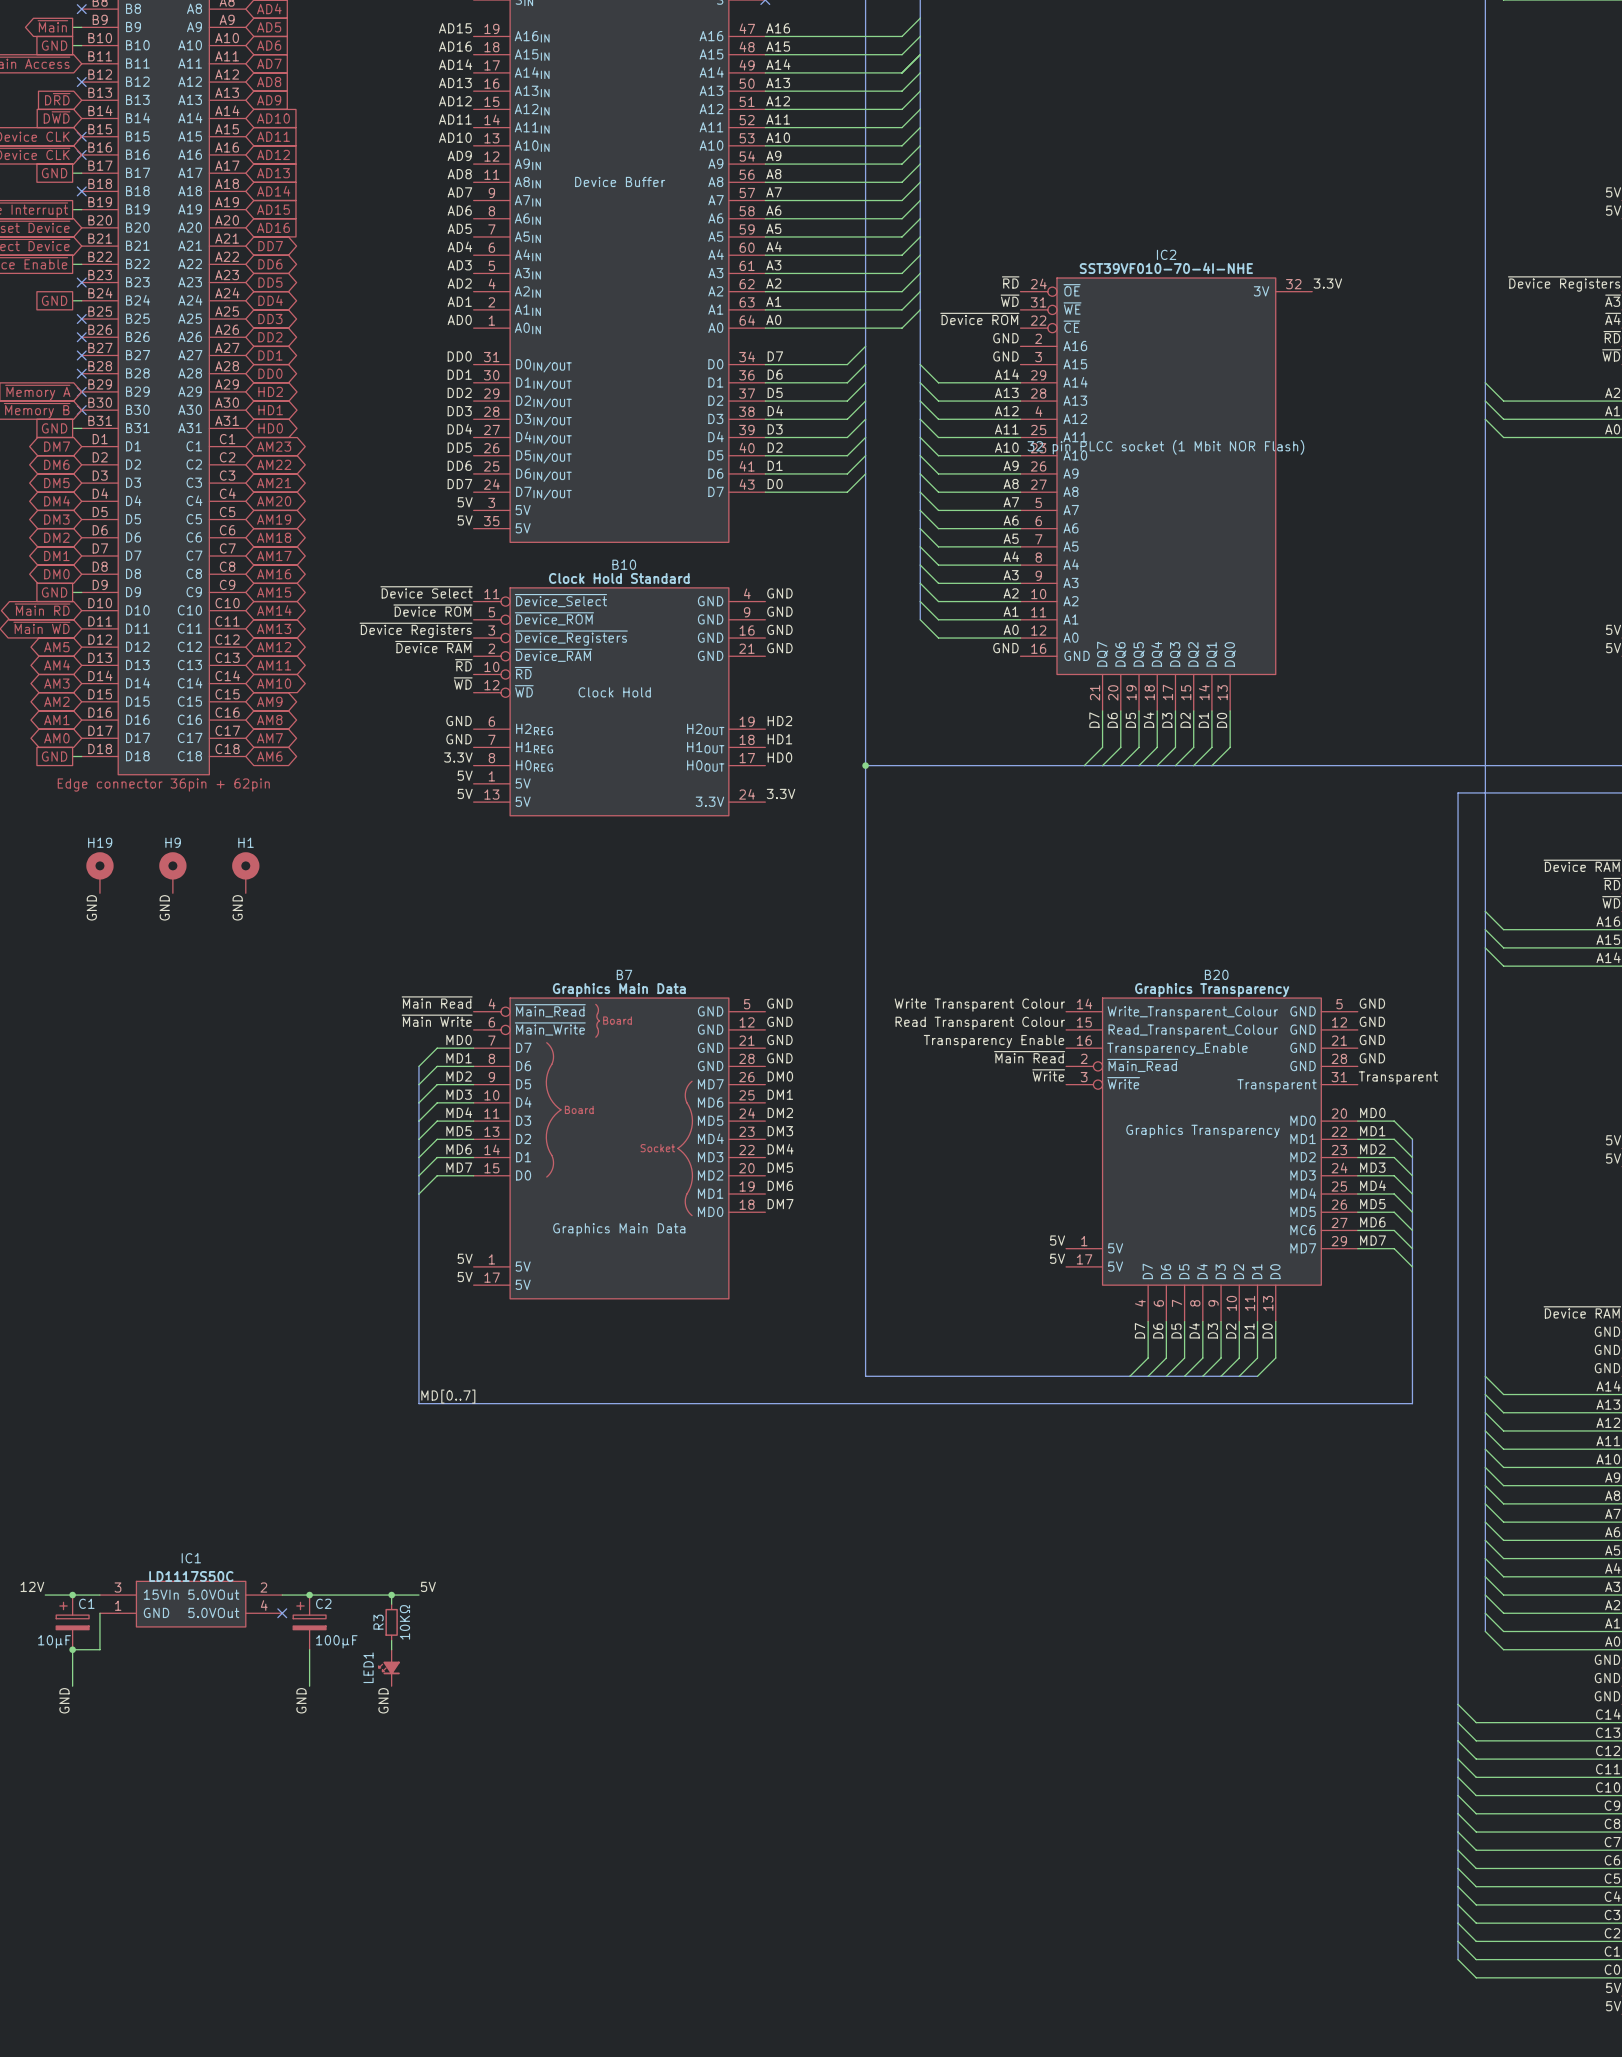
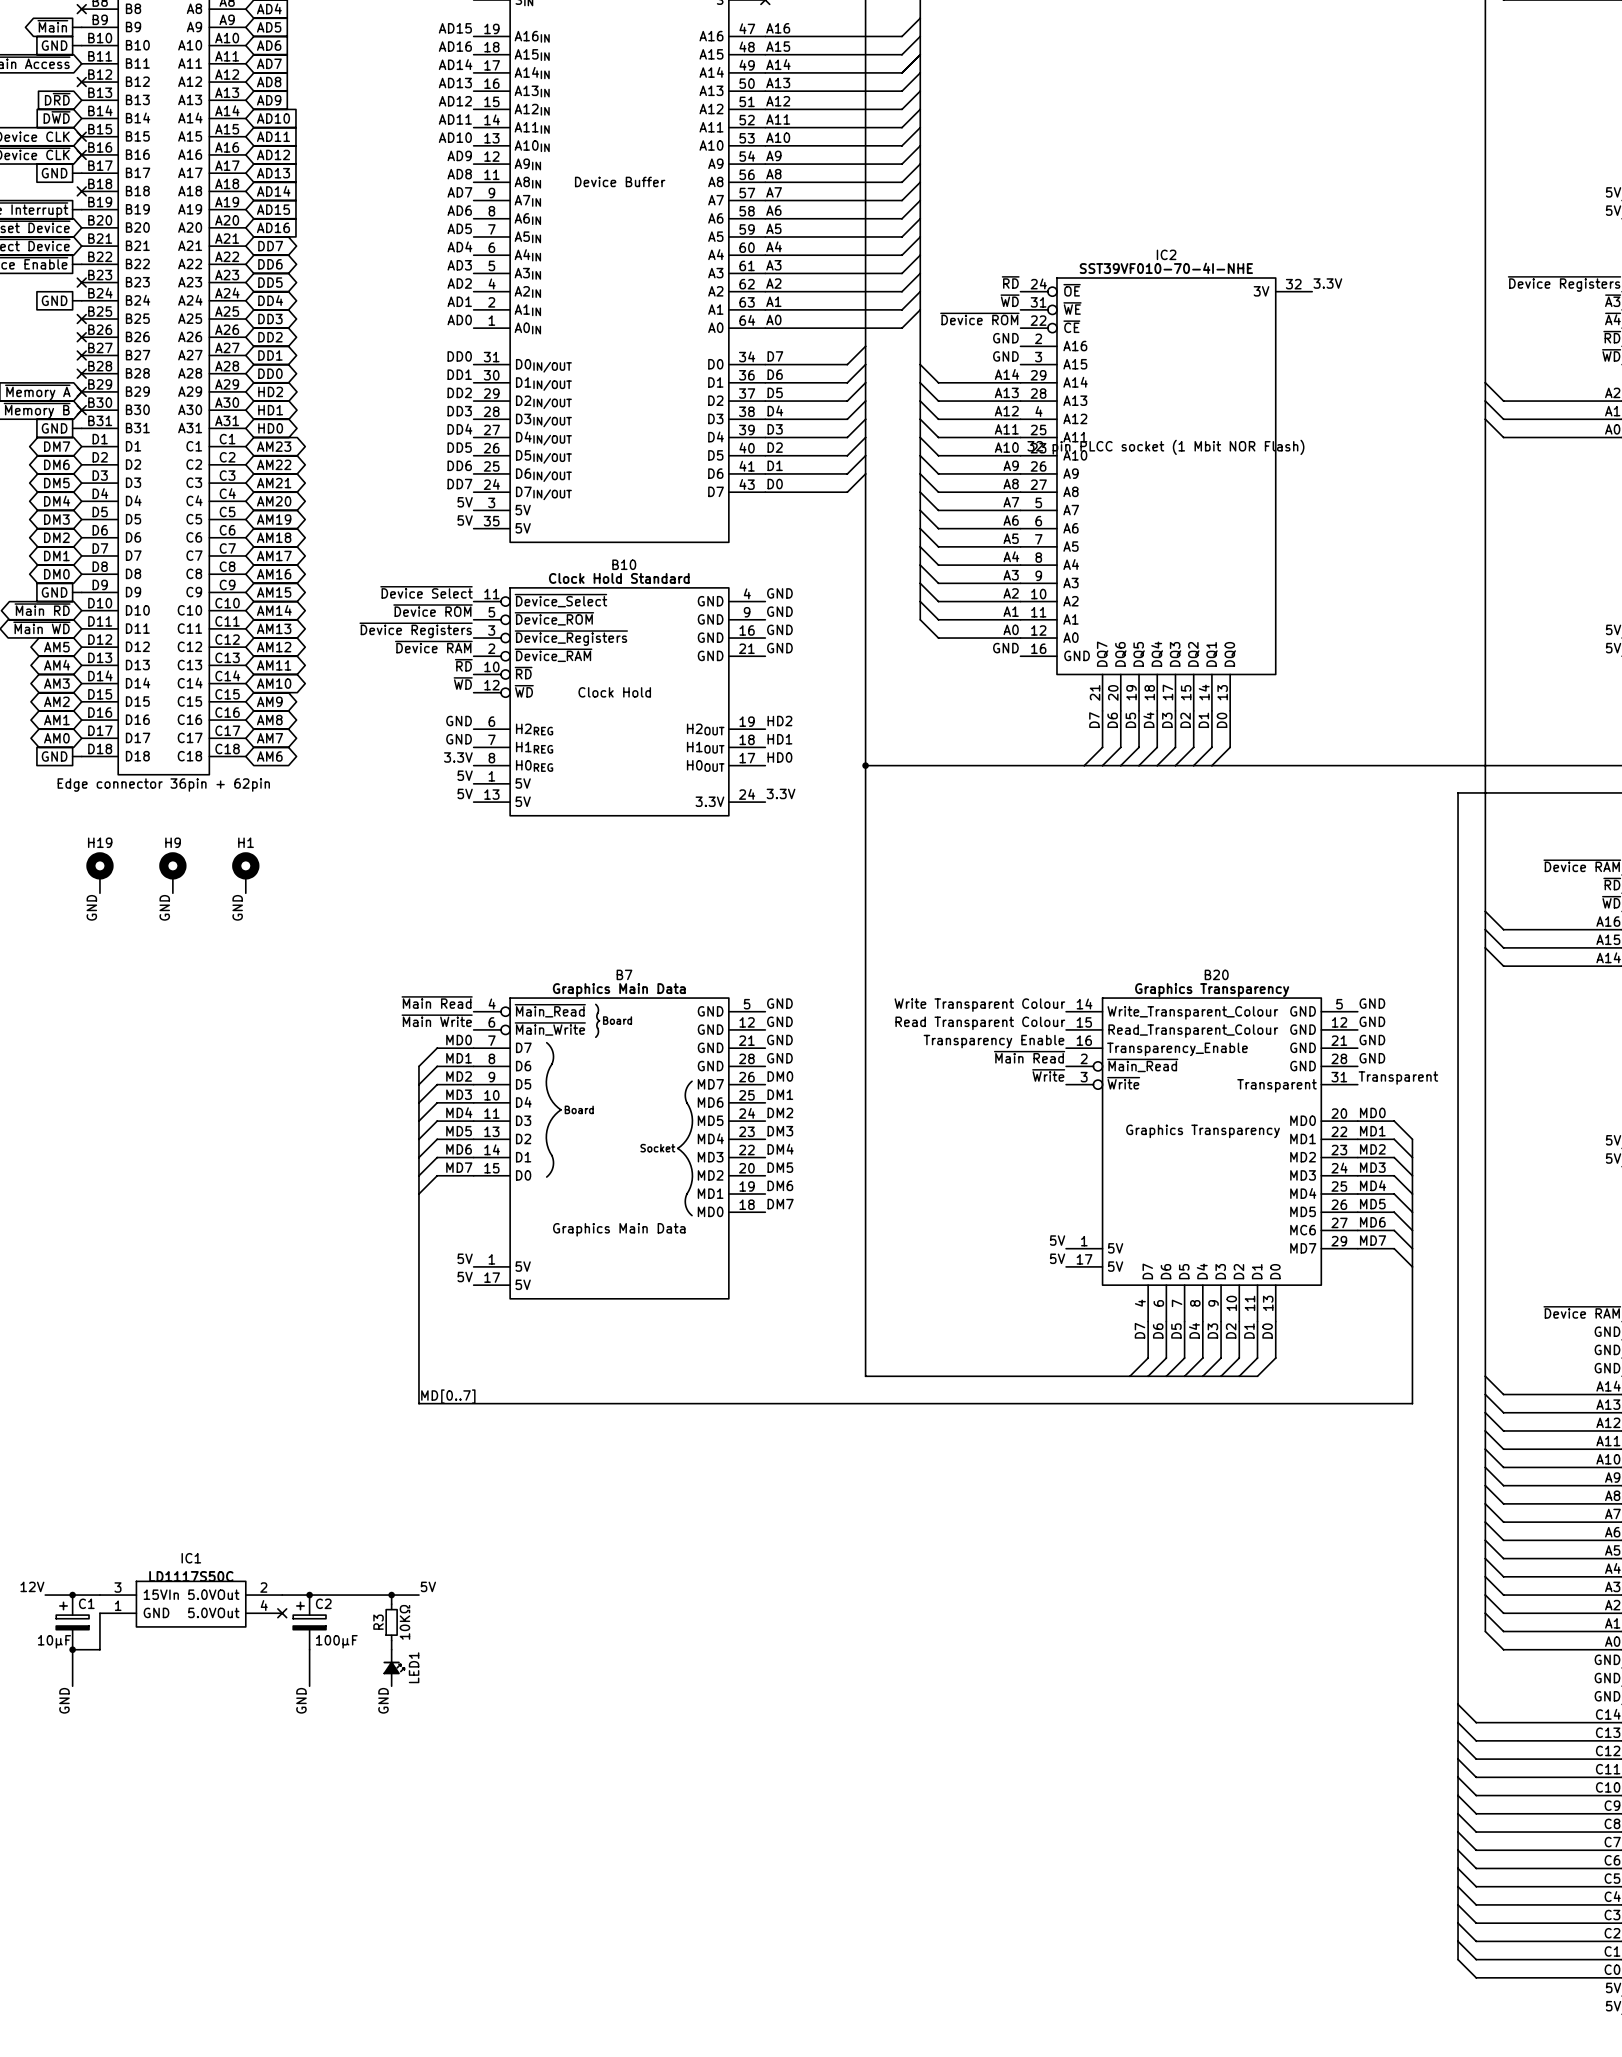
LED1 rotation: 0° (389, 1667) -> 180° (393, 1667)

